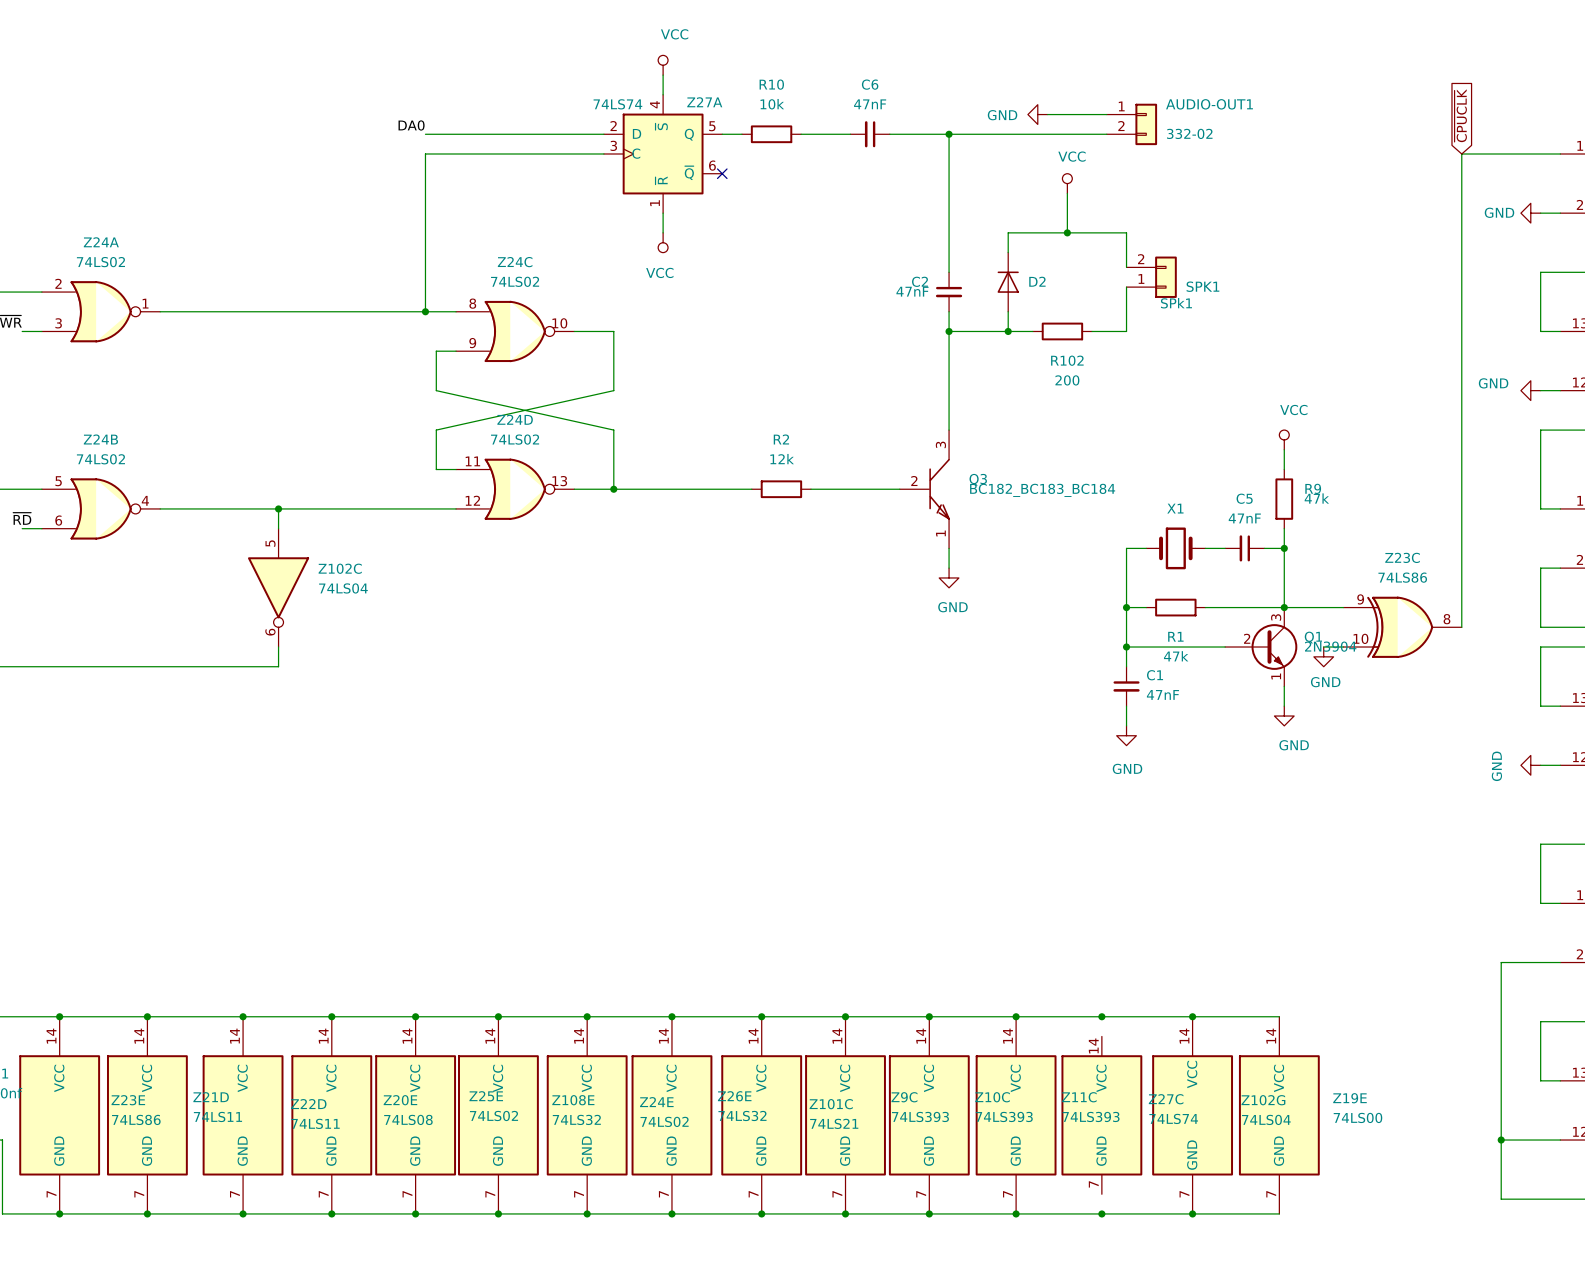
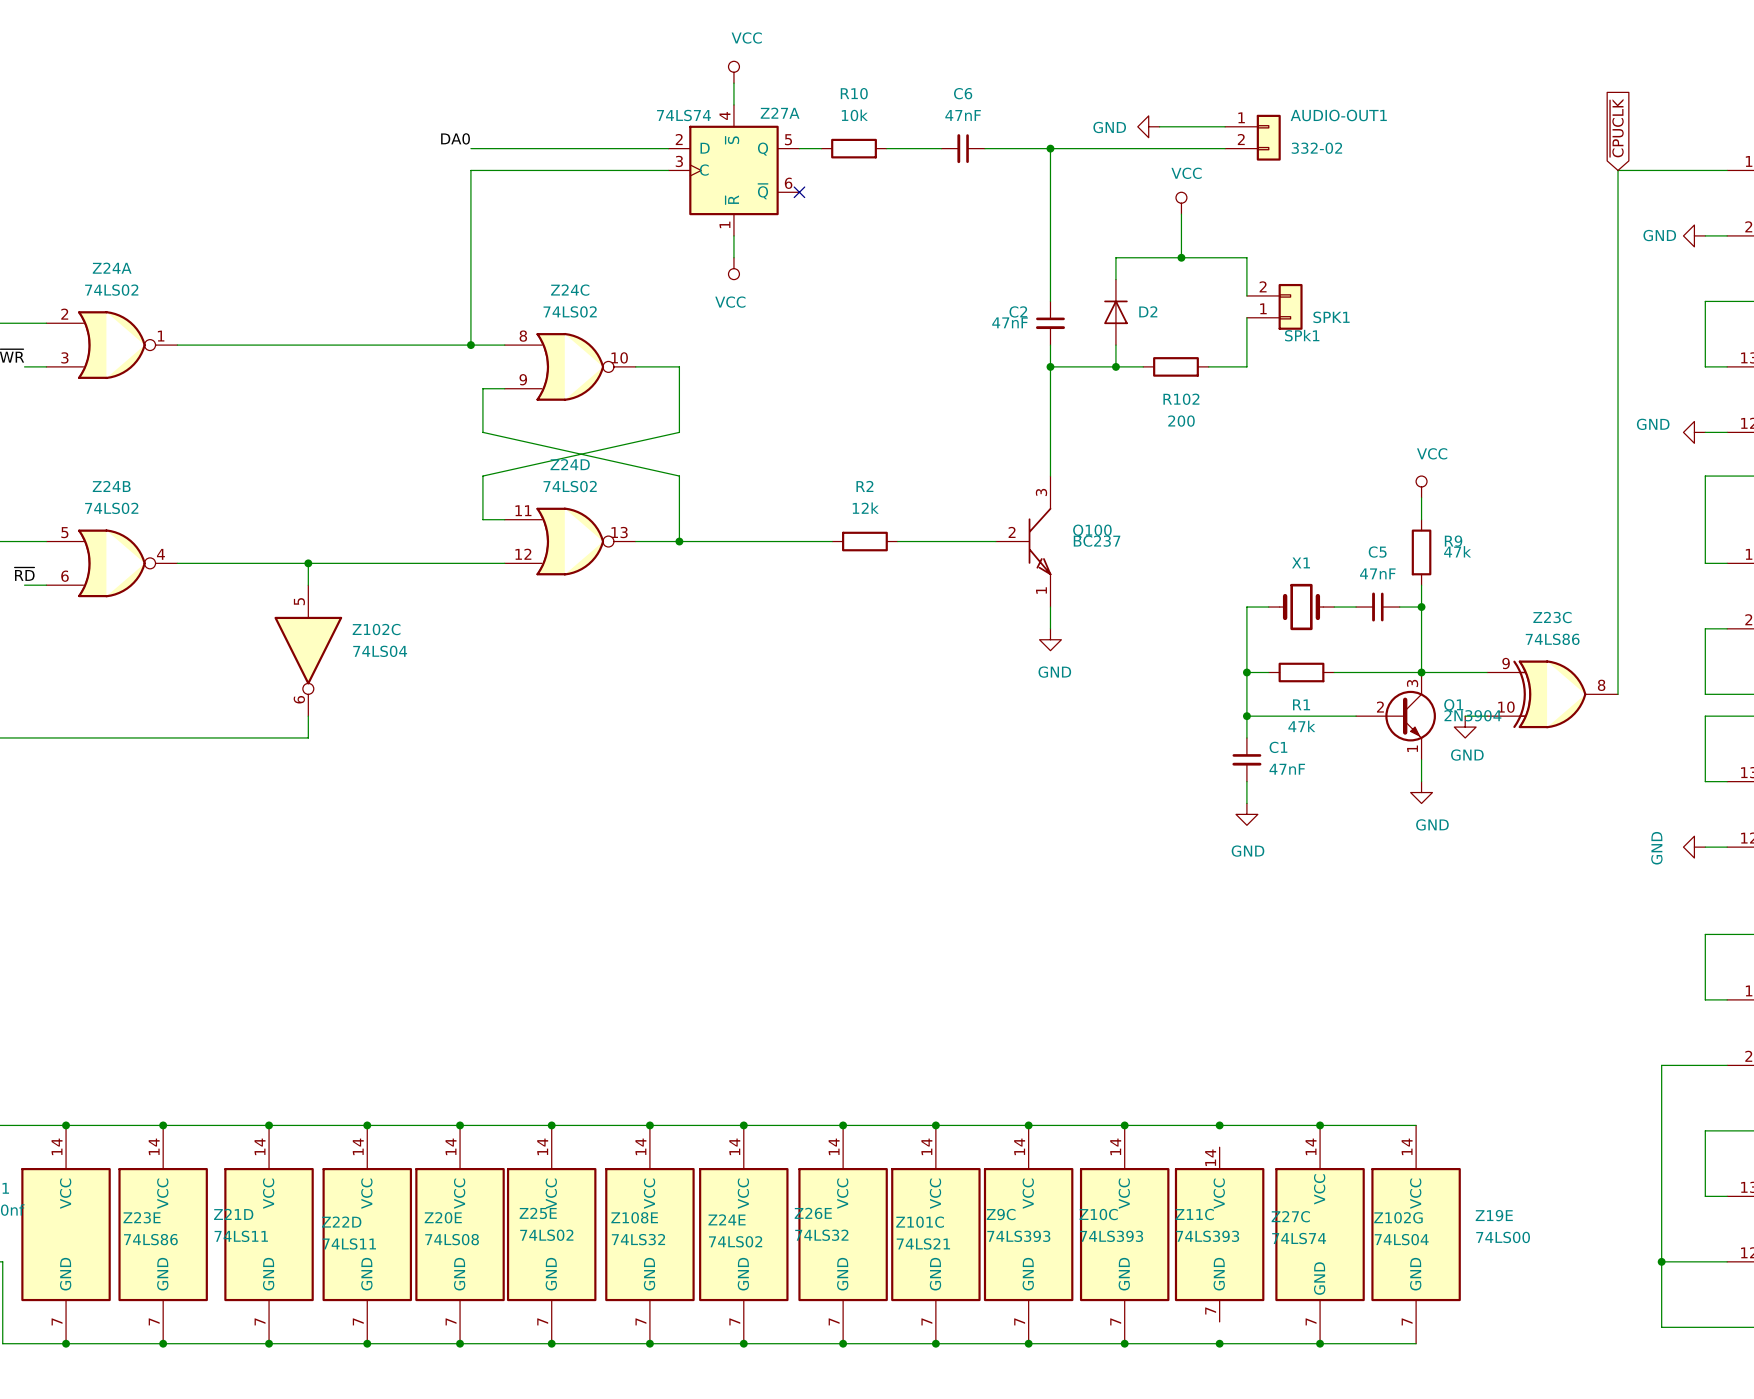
Q3 name: Q3 (978, 479) -> Q100 (1092, 531)
Q3 value: BC182_BC183_BC184 (1042, 490) -> BC237 (1097, 541)

